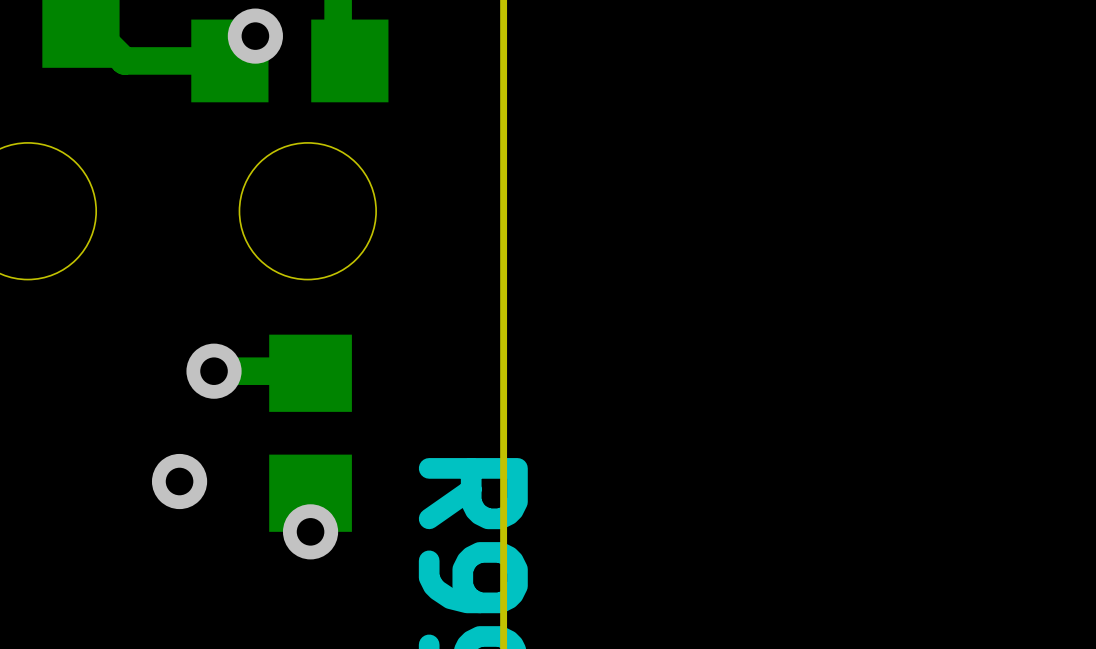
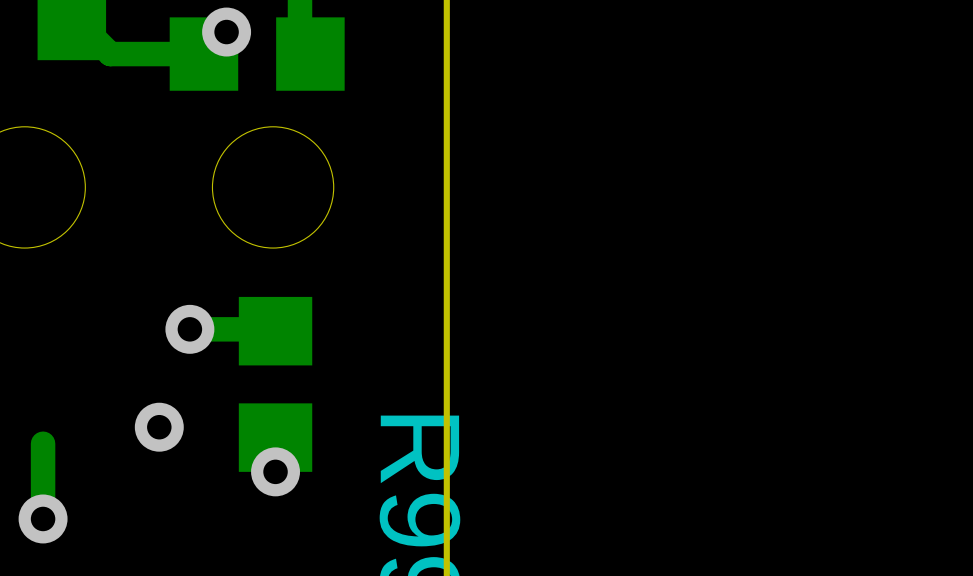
track: none -> (43, 443) (43, 518)
via: none -> (43, 518)

